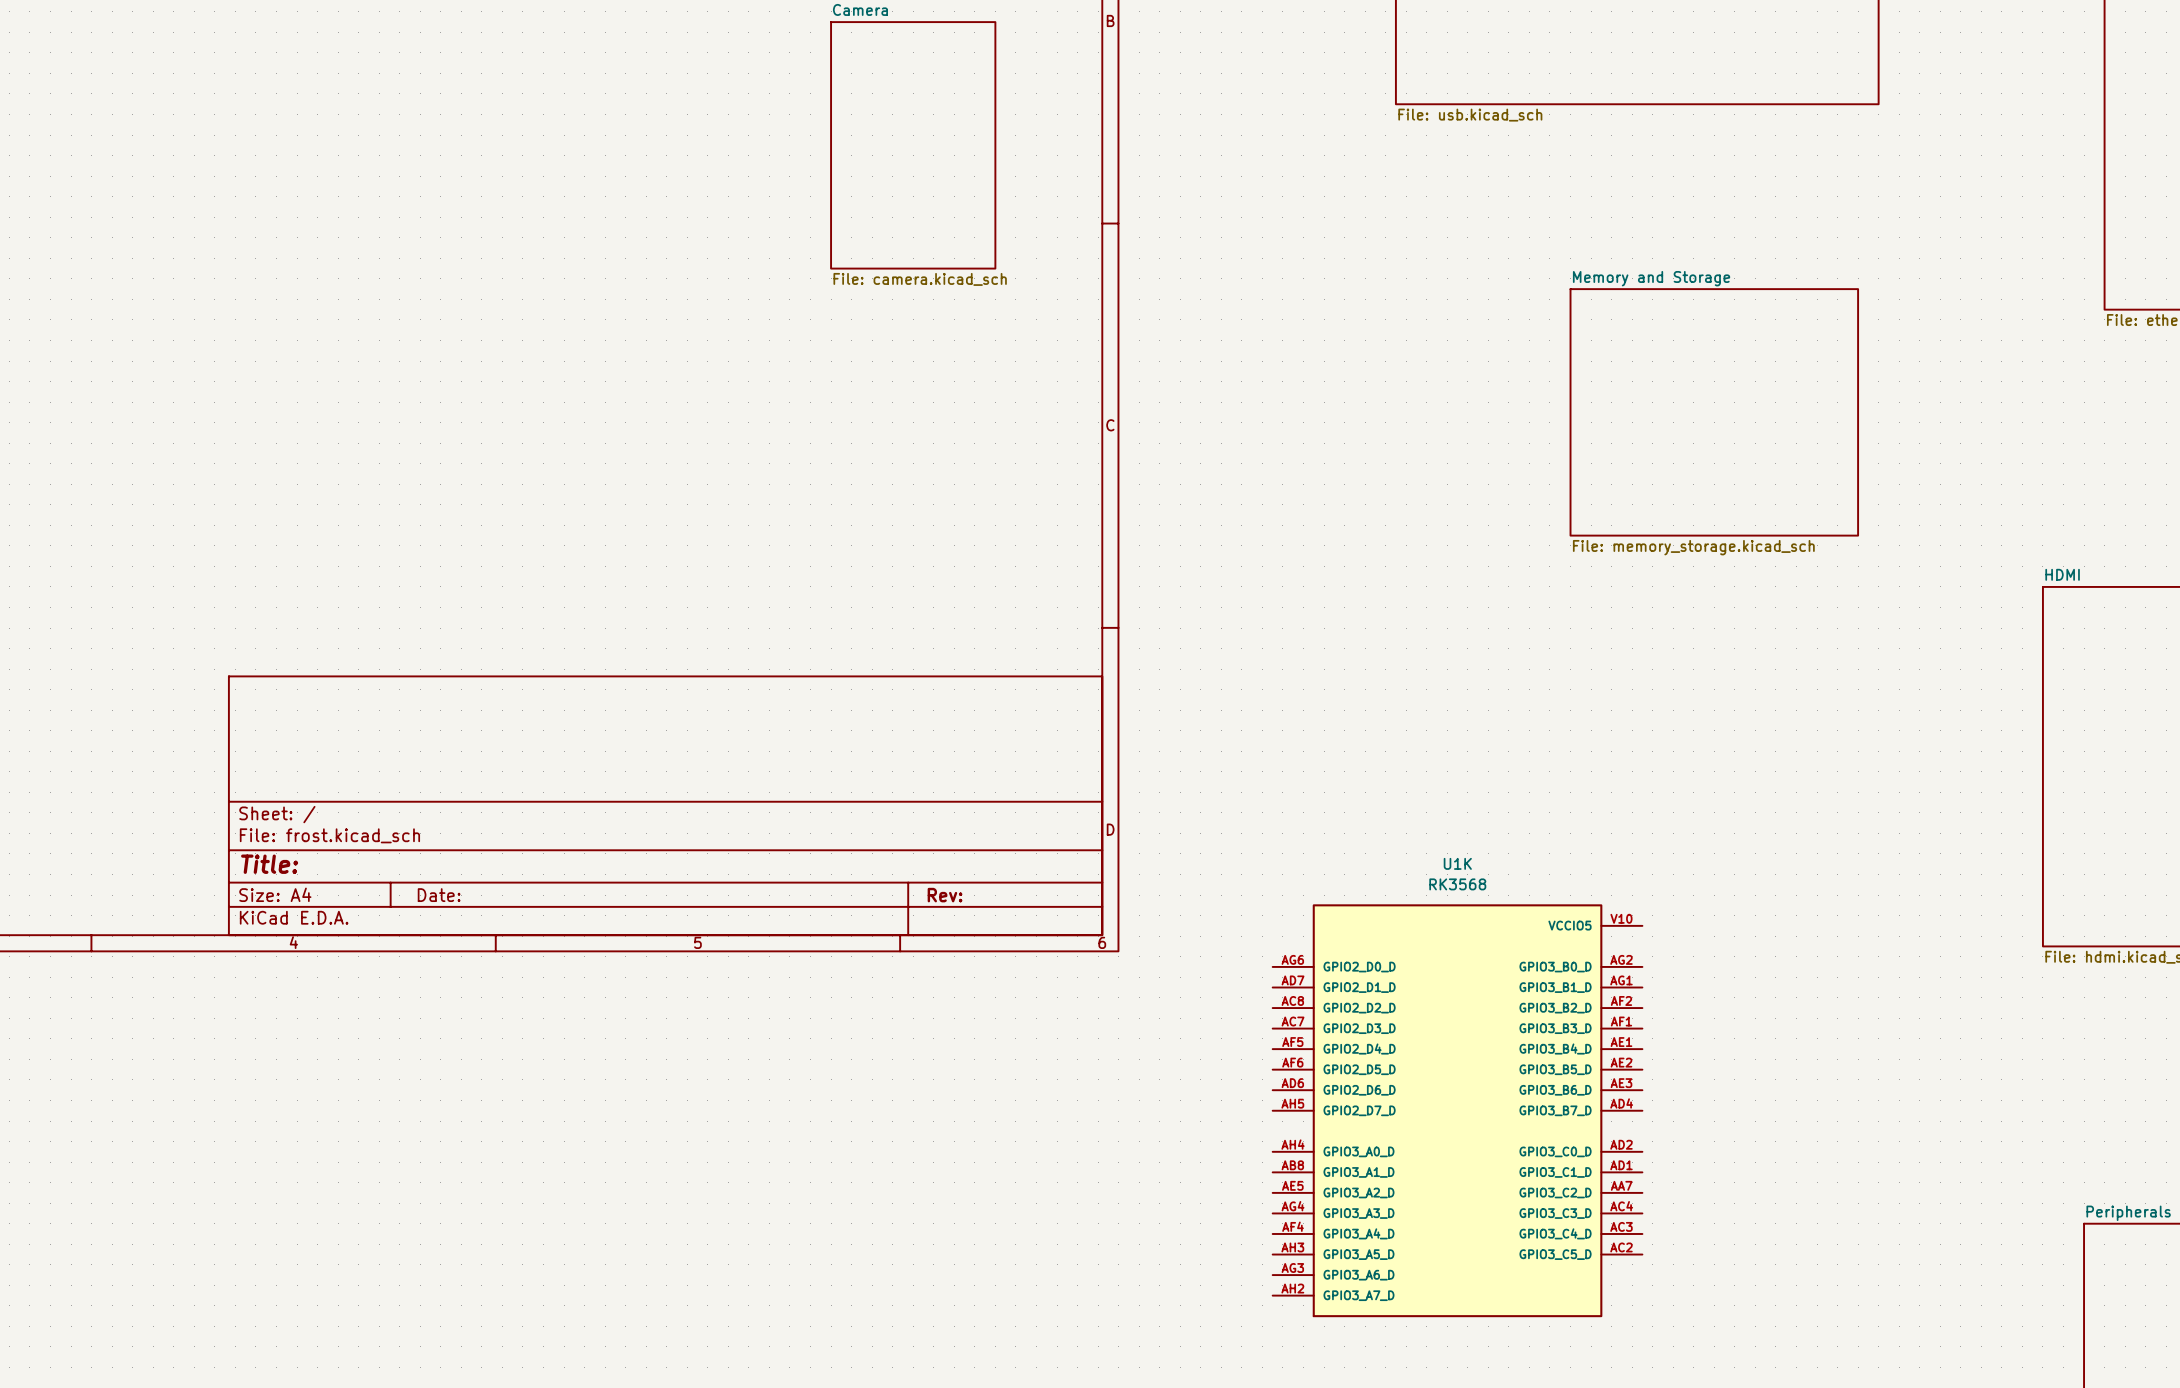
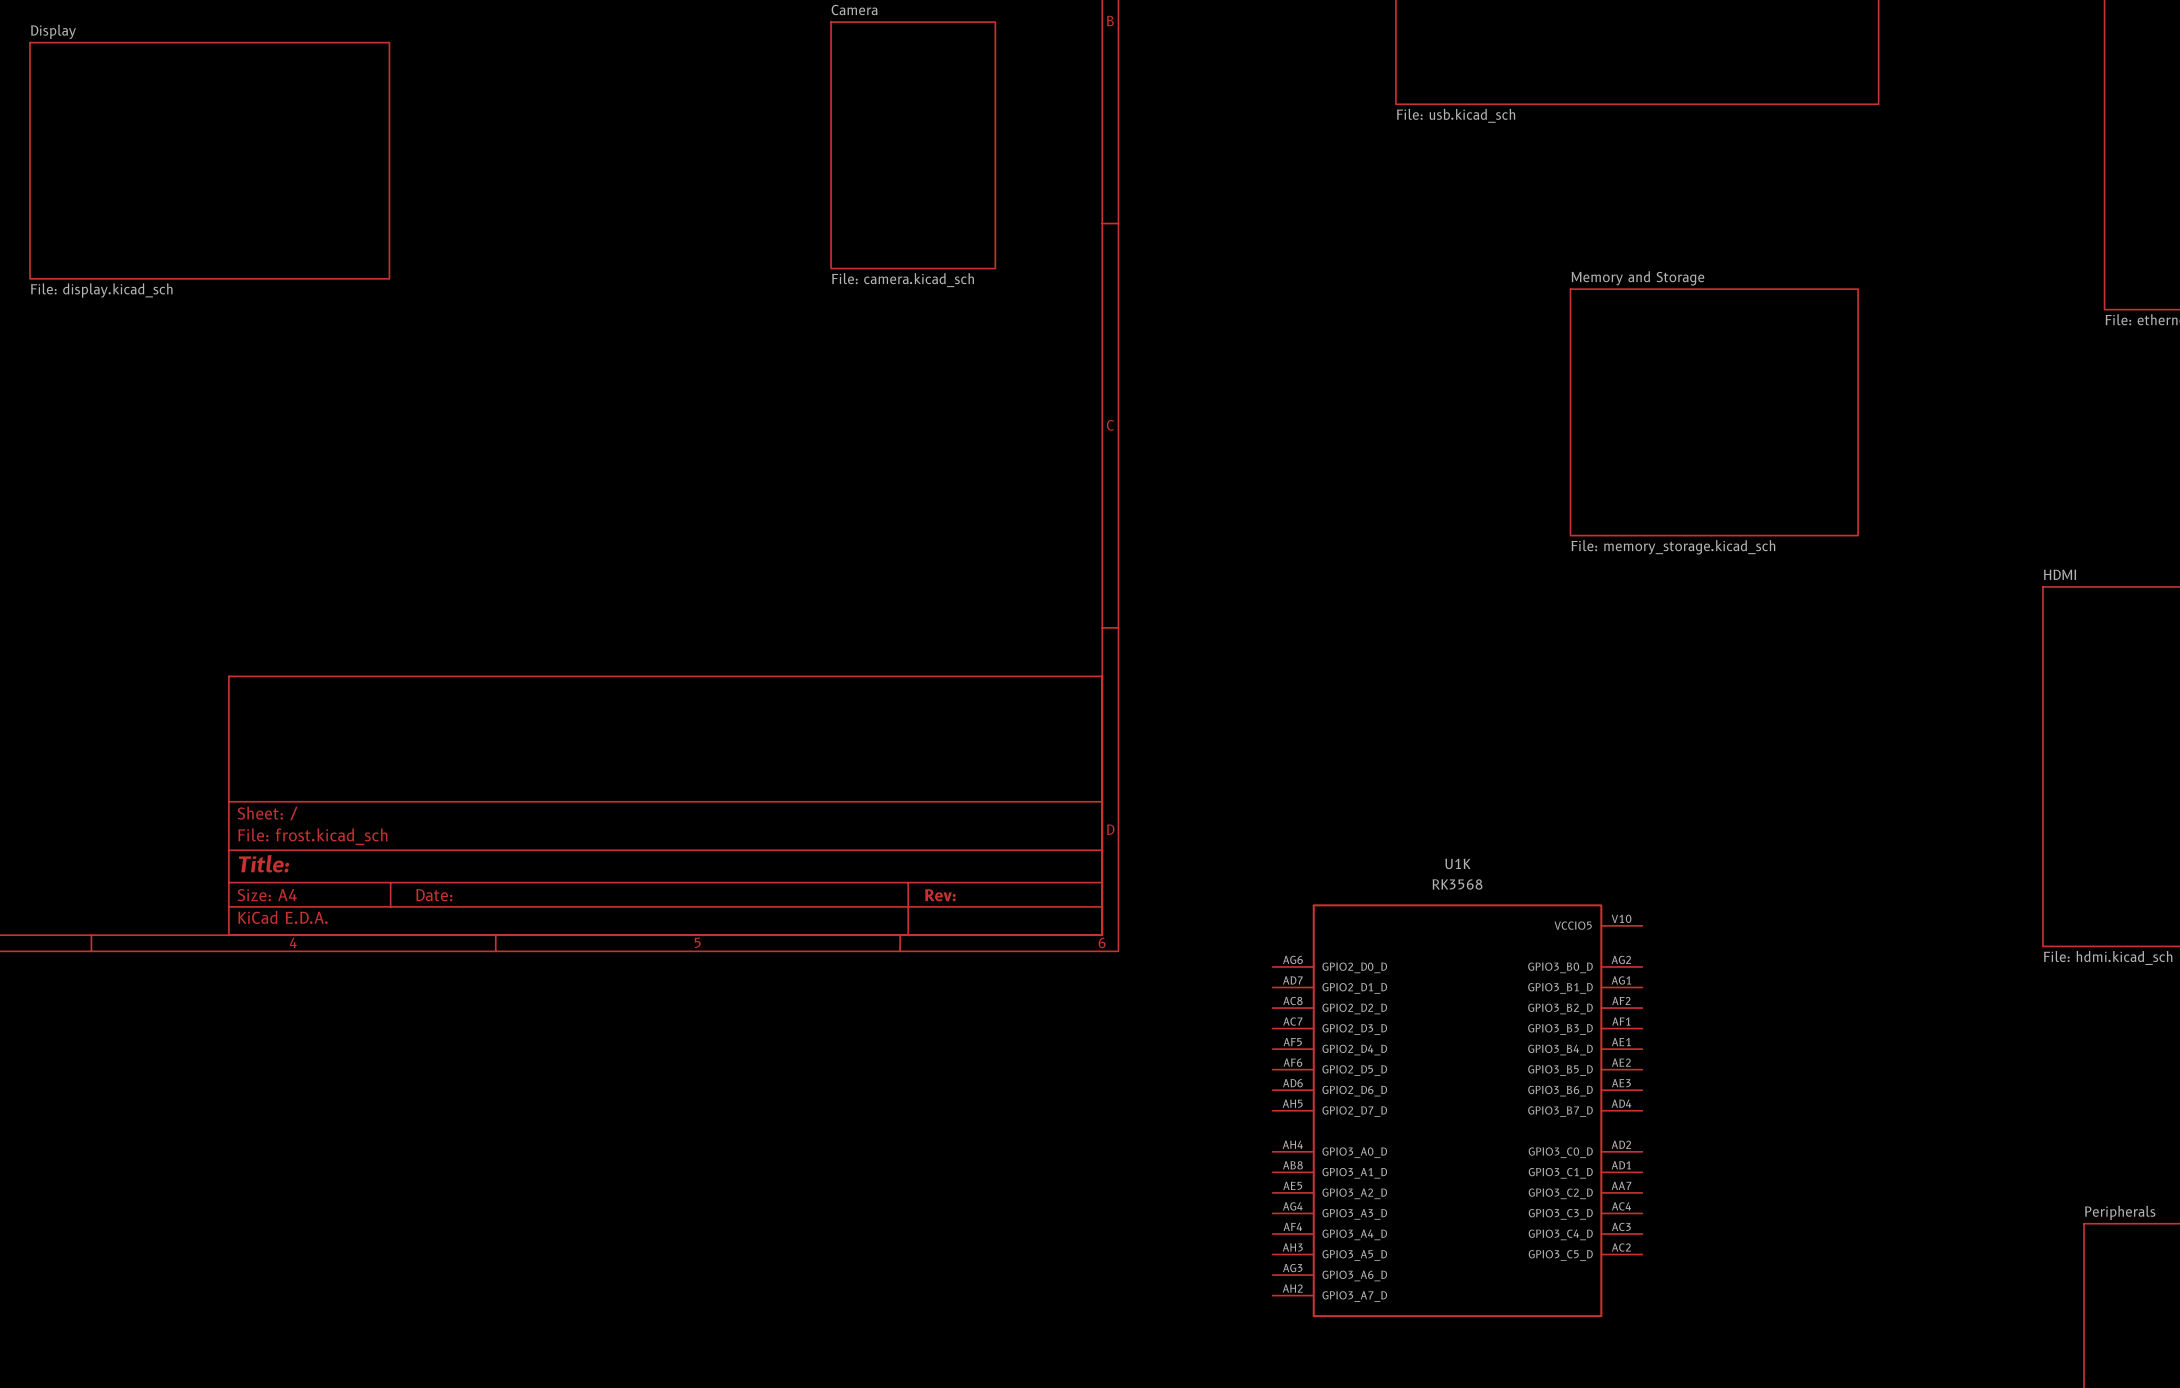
sheet Display: none -> File: display.kicad_sch (209, 160)

